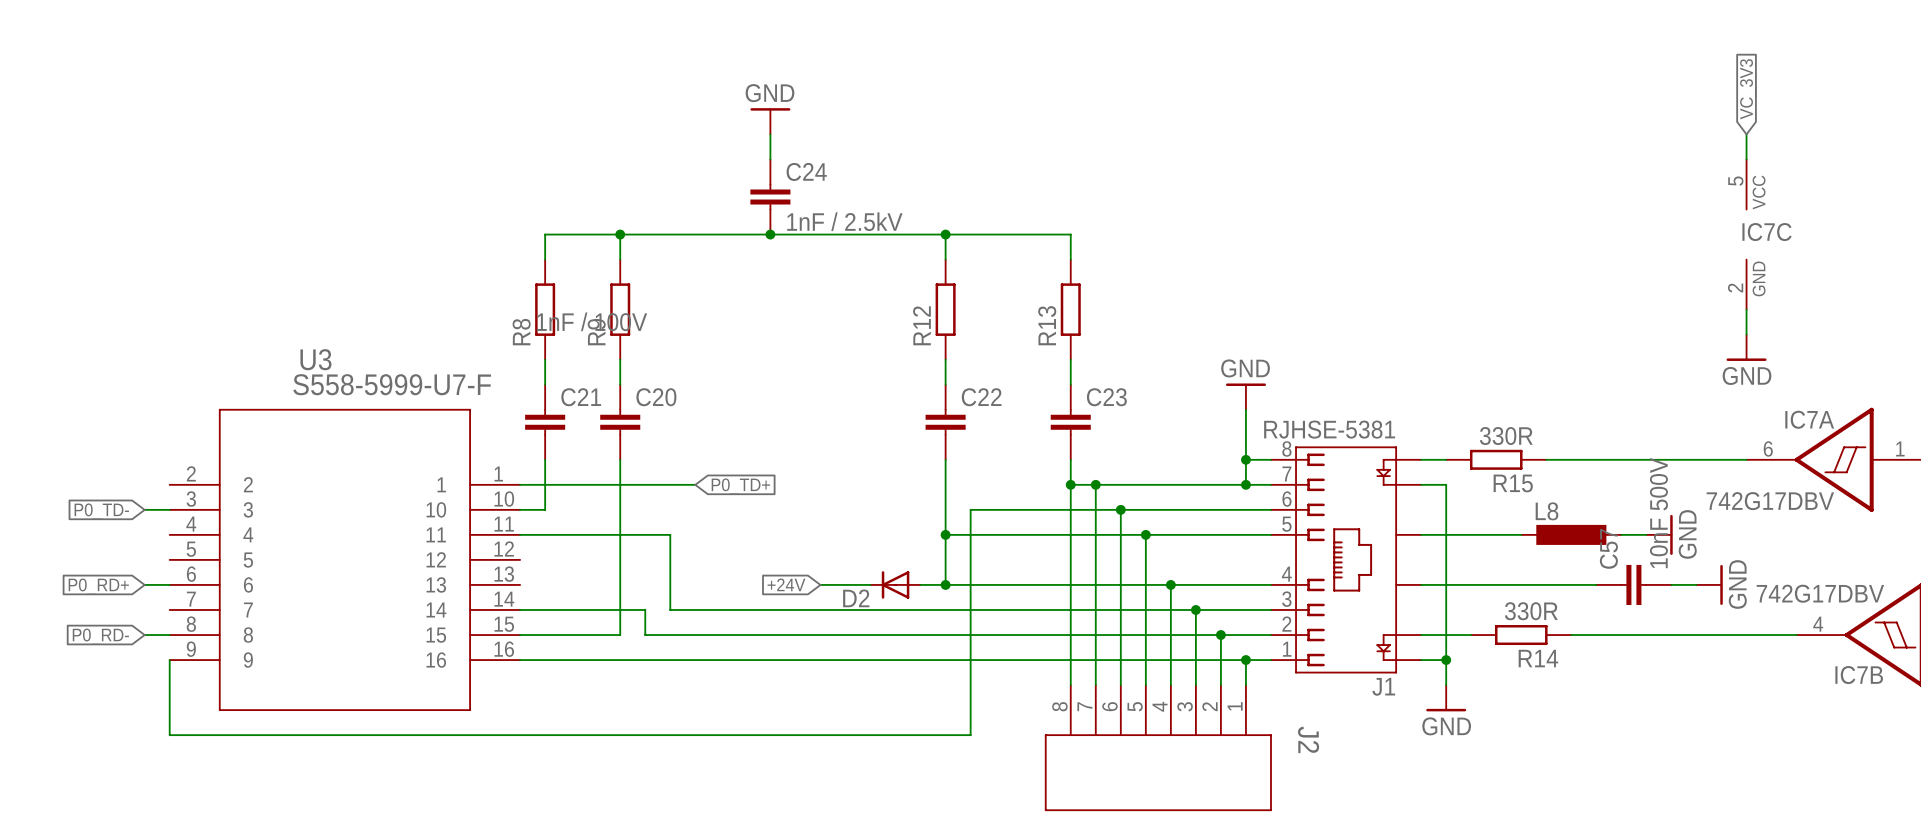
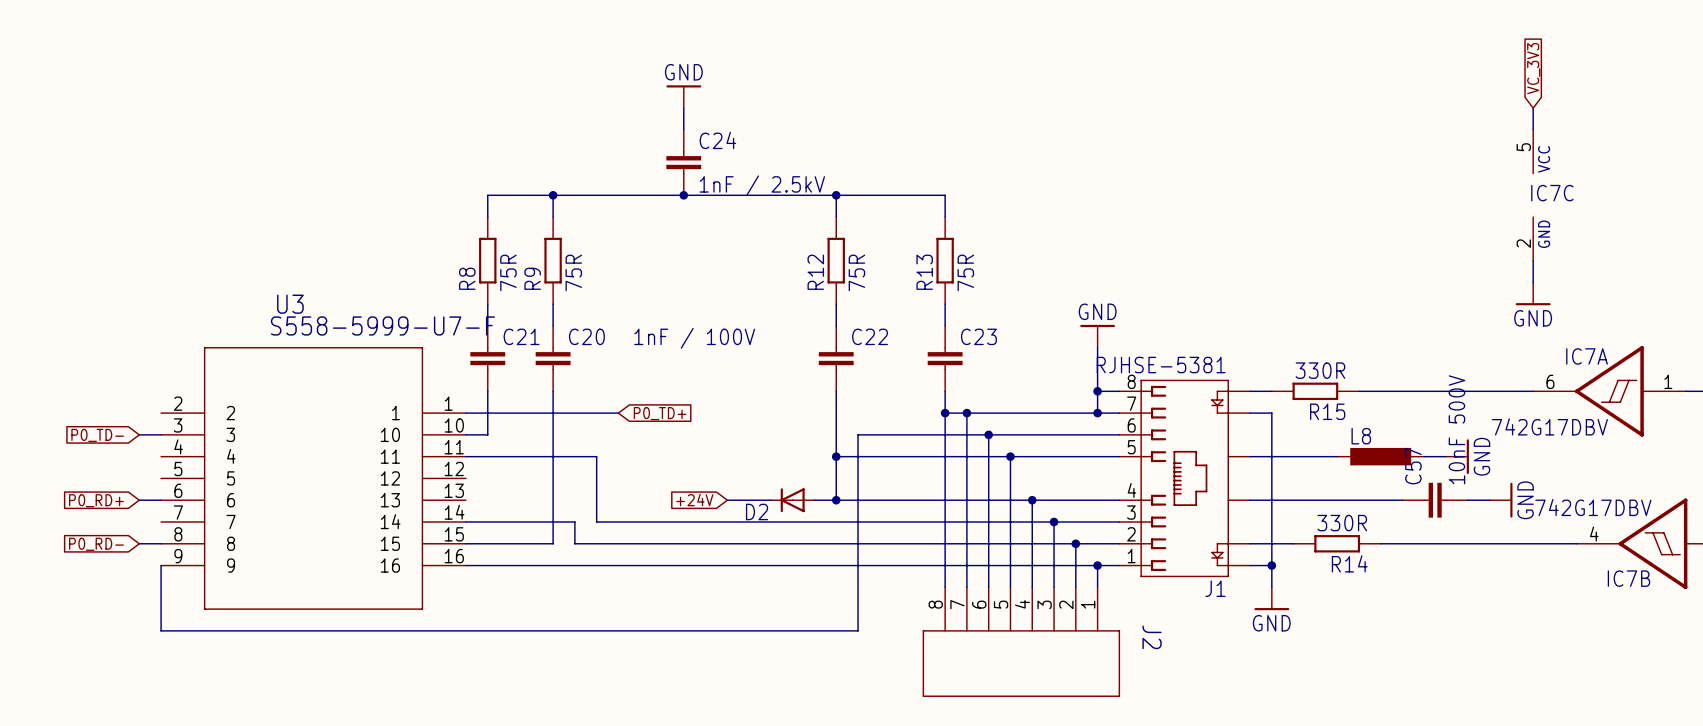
C20 value position: 1nF / 100V (592, 321) -> 1nF / 100V (694, 338)
R8 value: none -> 75R (508, 272)
R9 value: none -> 75R (573, 272)
R12 value: none -> 75R (856, 272)
R13 value: none -> 75R (965, 272)

